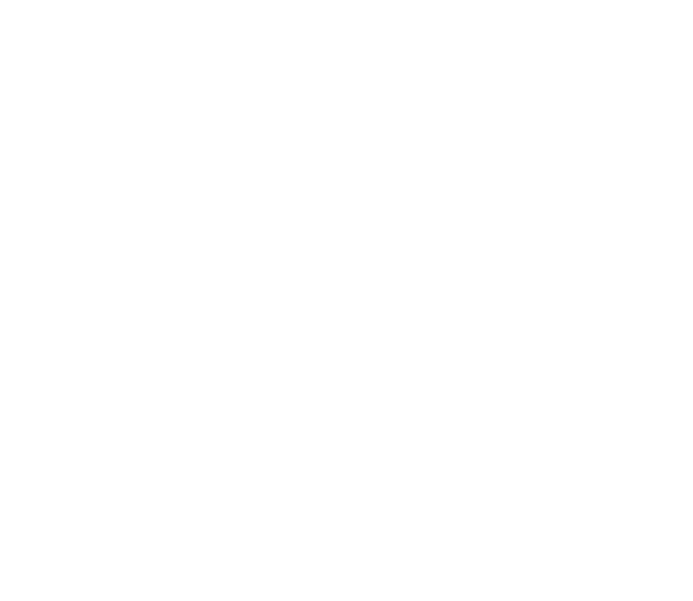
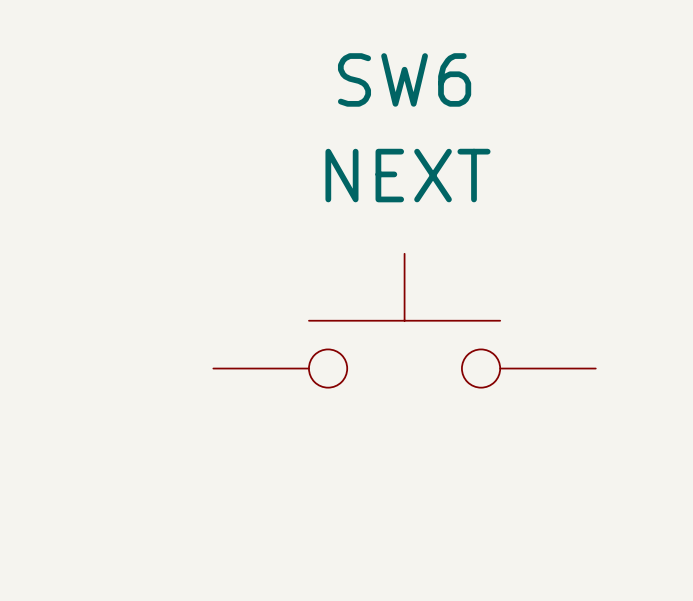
SW6: none -> NEXT (404, 320)

